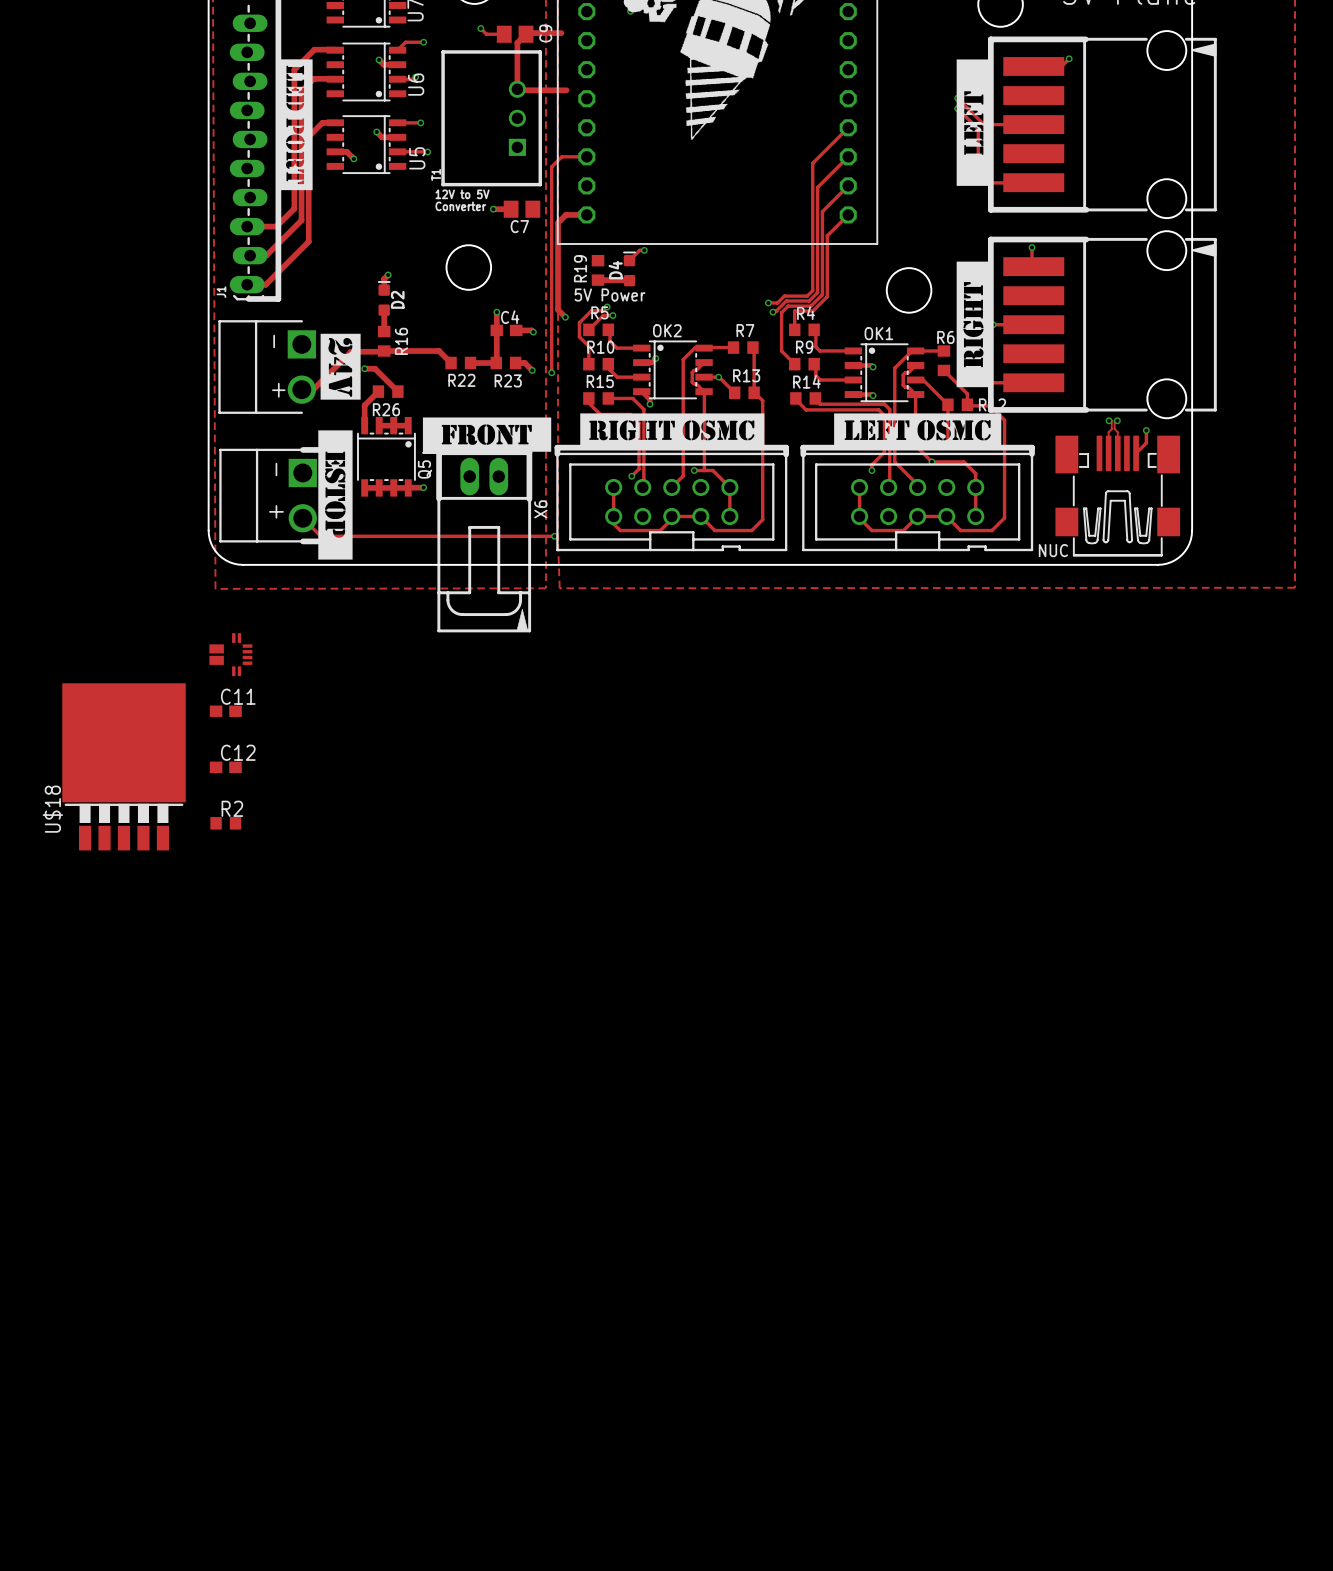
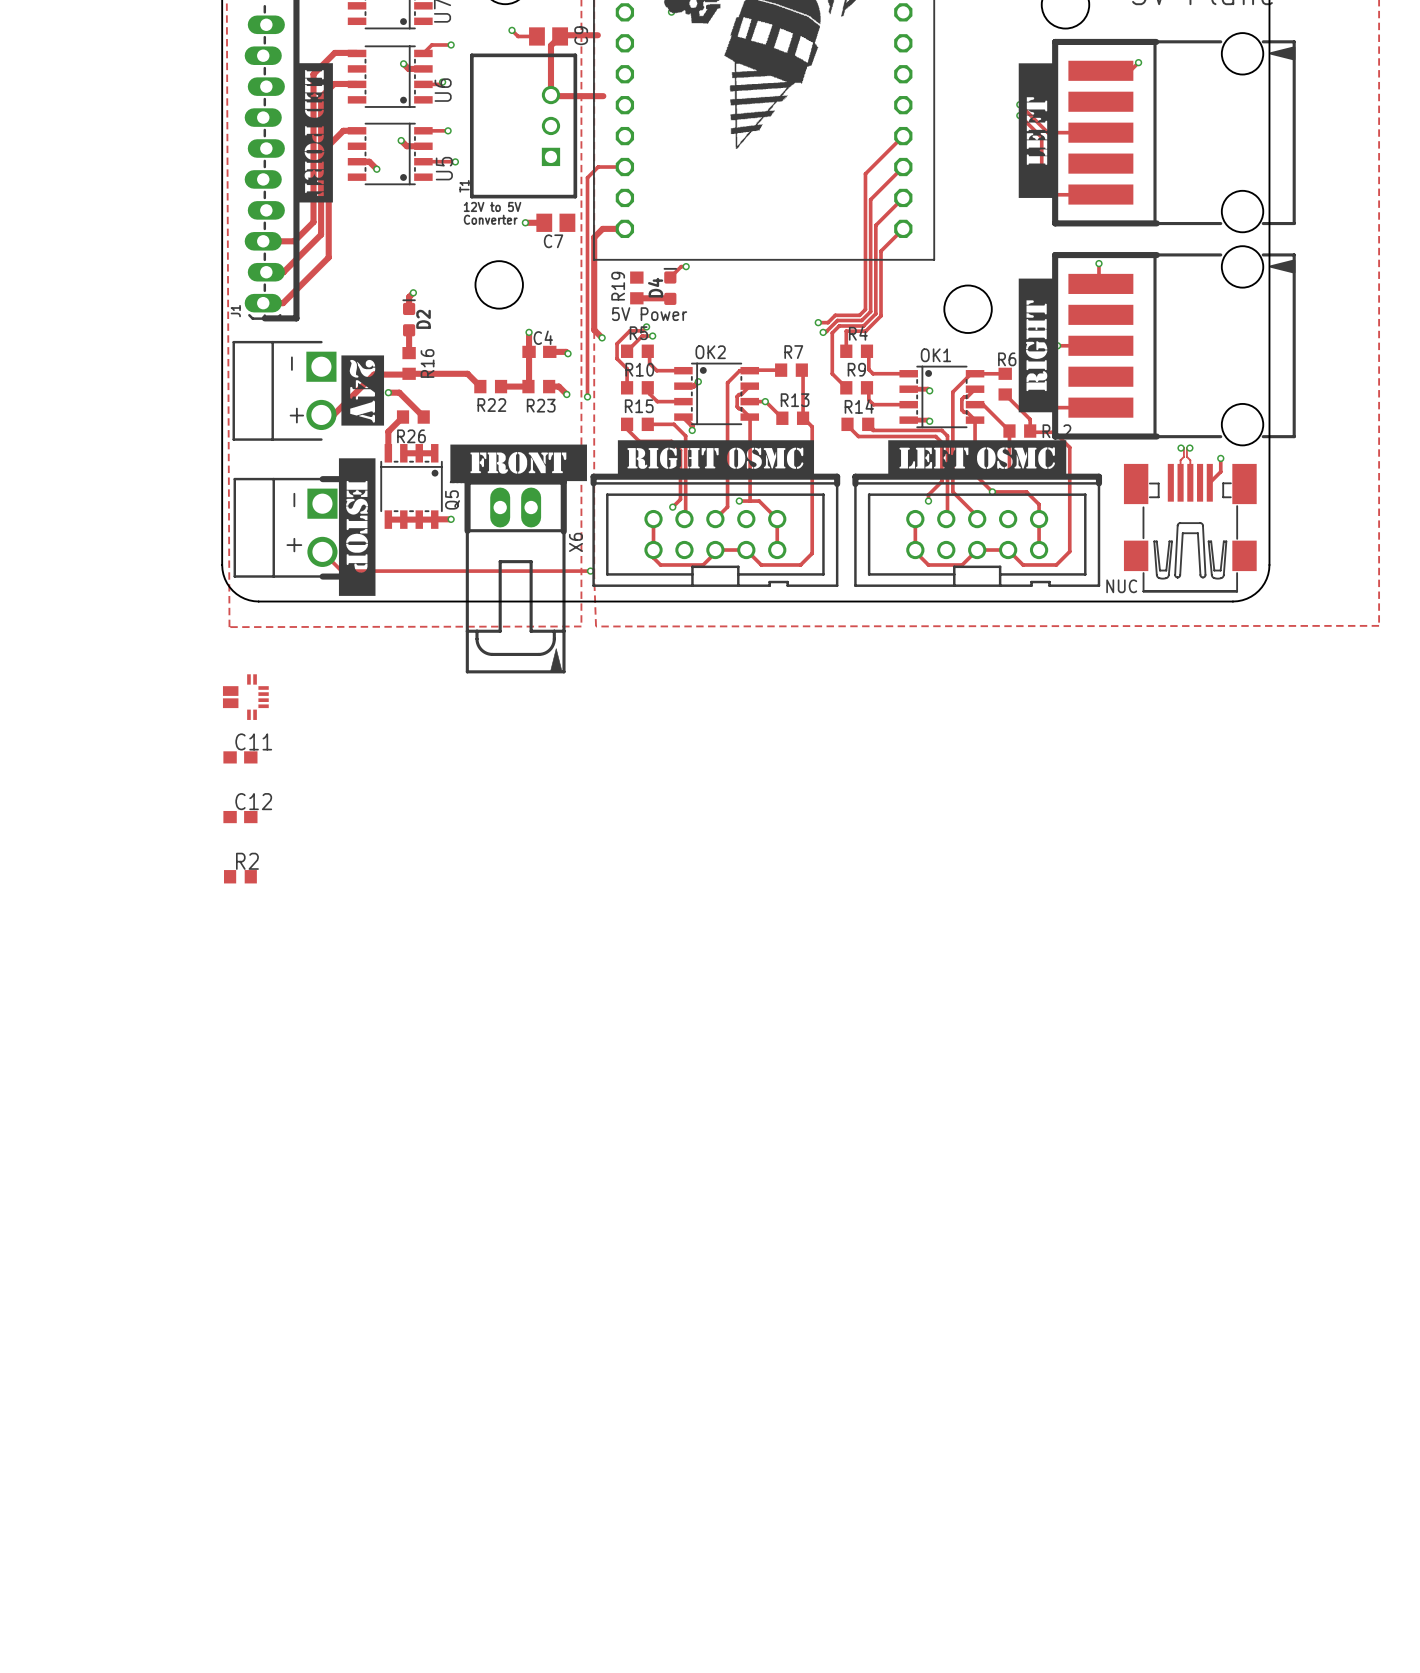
U$18: (124, 766) -> none

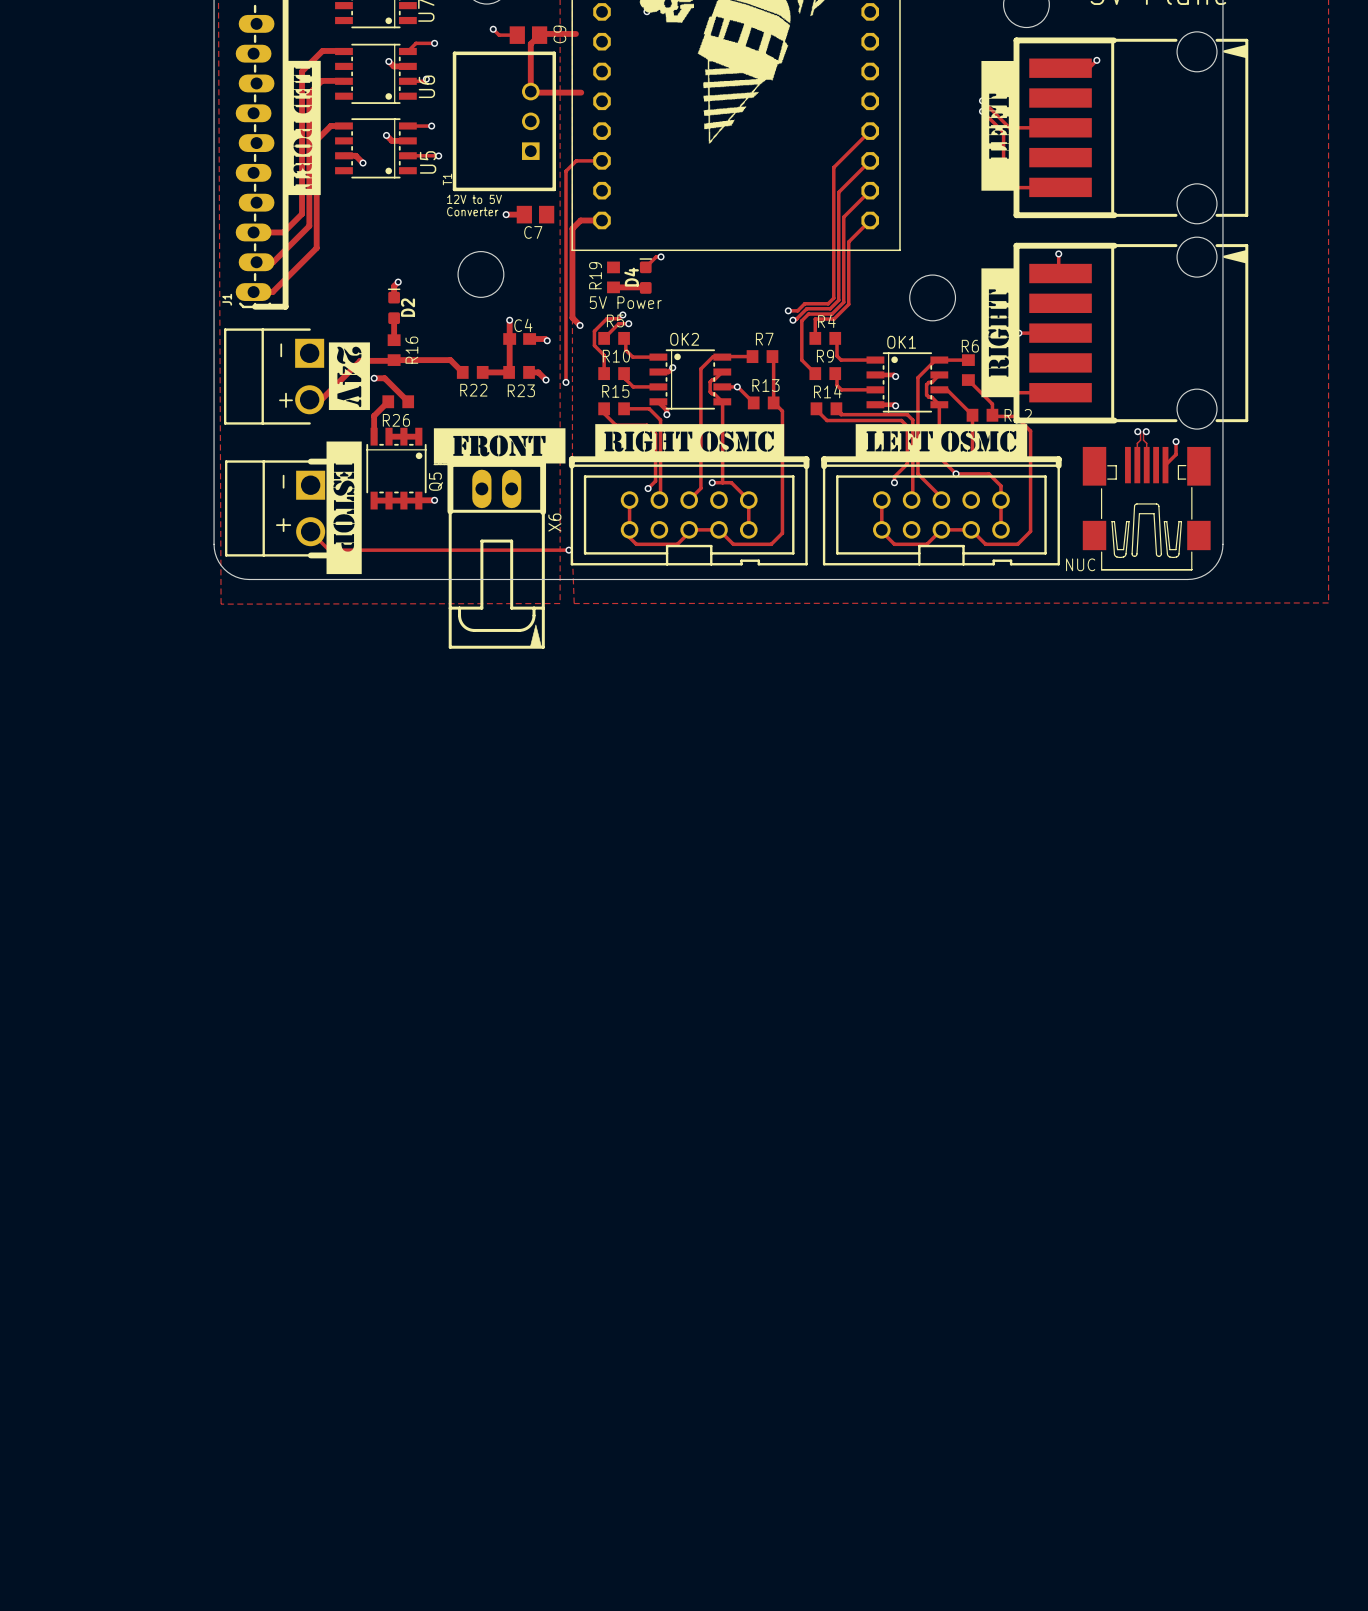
part: (245, 697) -> none
C11: (240, 757) -> none
C12: (240, 817) -> none
R2: (240, 876) -> none

